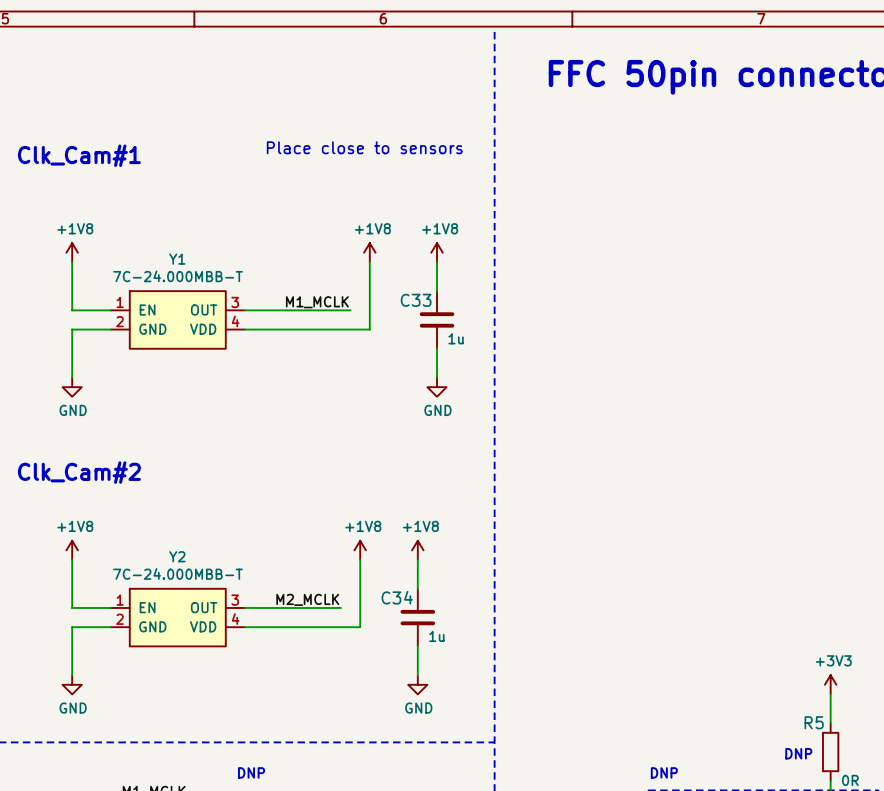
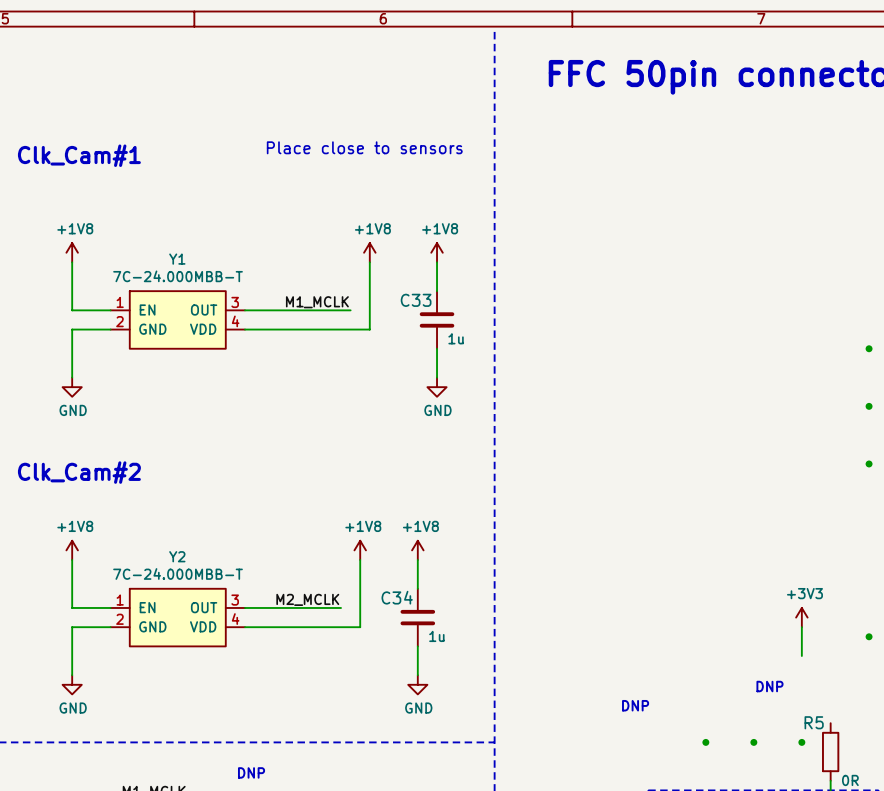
junction: none -> (869, 348)
junction: none -> (869, 406)
junction: none -> (869, 463)
junction: none -> (869, 636)
power symbol position: +3V3 (830, 684) -> +3V3 (801, 617)
text: none -> DNP (769, 686)
wire: (830, 694) (830, 723) -> (801, 627) (801, 655)
text: none -> DNP (635, 705)
junction: none -> (705, 742)
junction: none -> (753, 742)
junction: none -> (801, 742)
text: DNP (798, 753) -> none
text: DNP (664, 772) -> none

